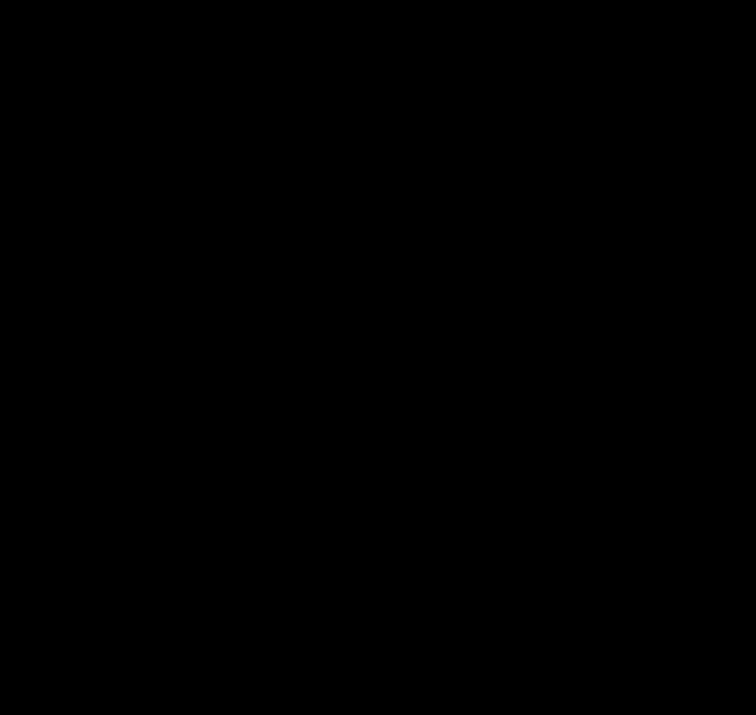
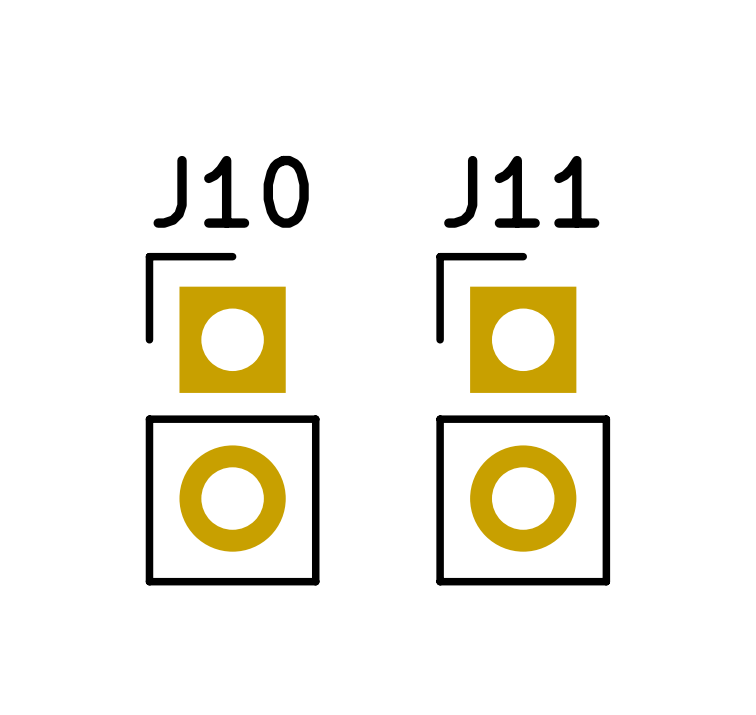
J10: none -> (232, 419)
J11: none -> (523, 419)

